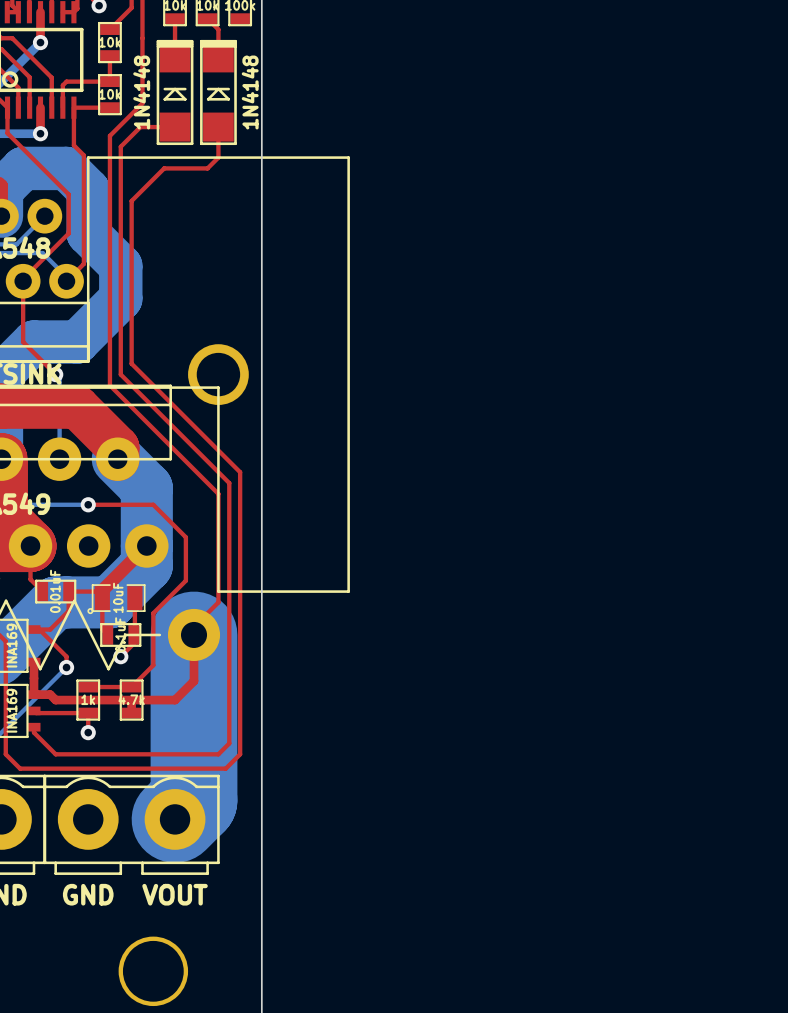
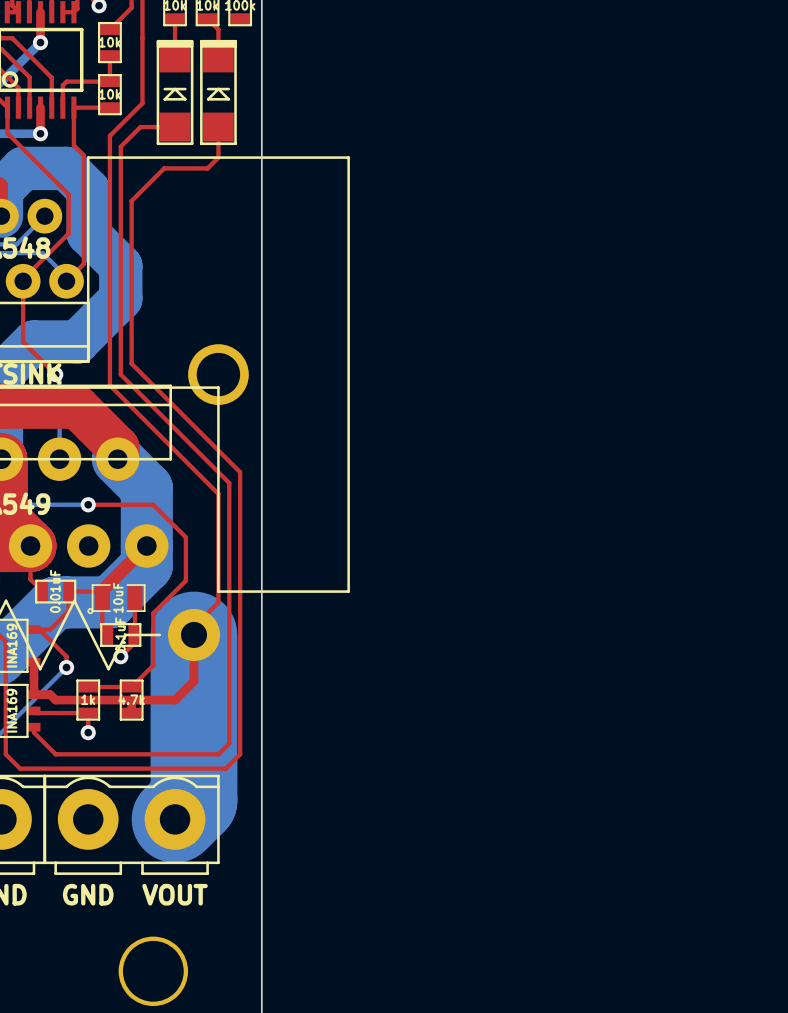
part value: 1N4148 (141, 92) -> none
part value: 1N4148 (250, 92) -> none

